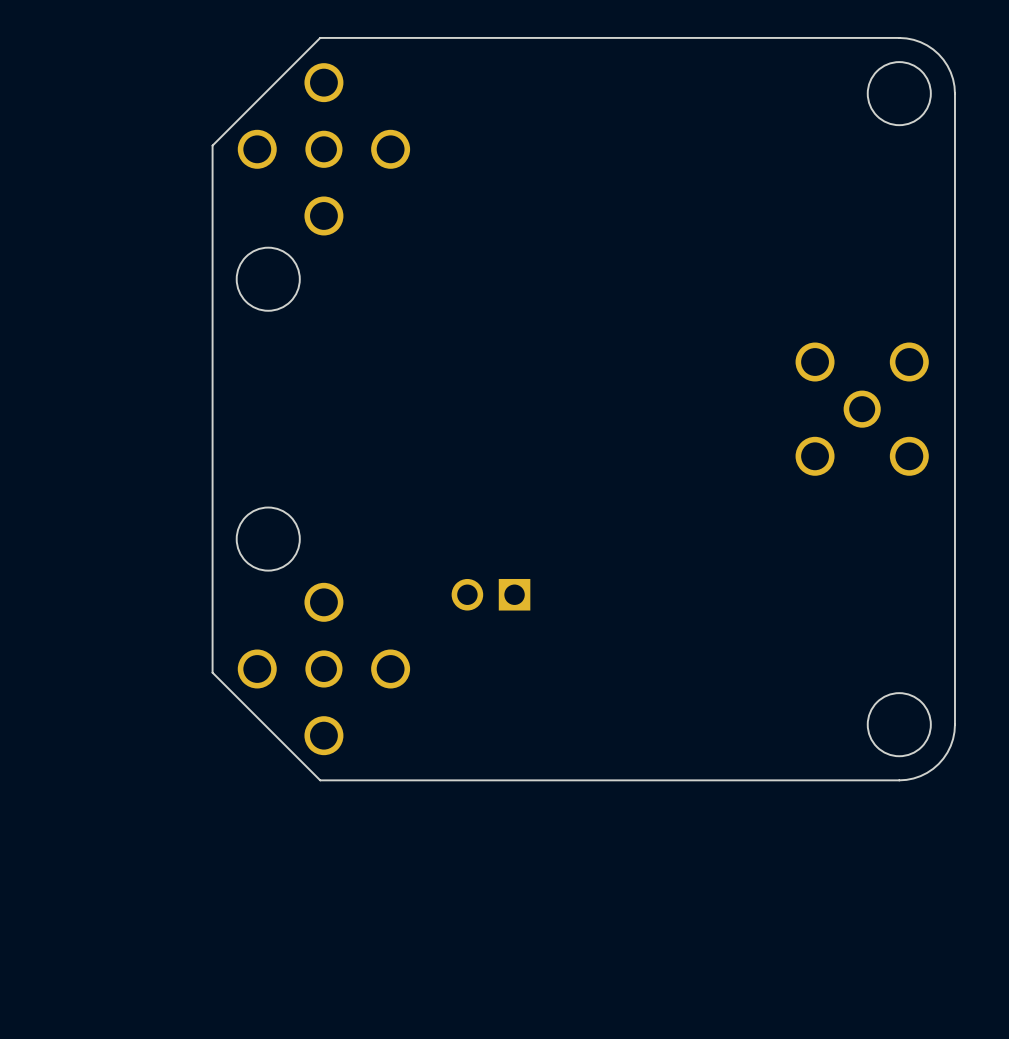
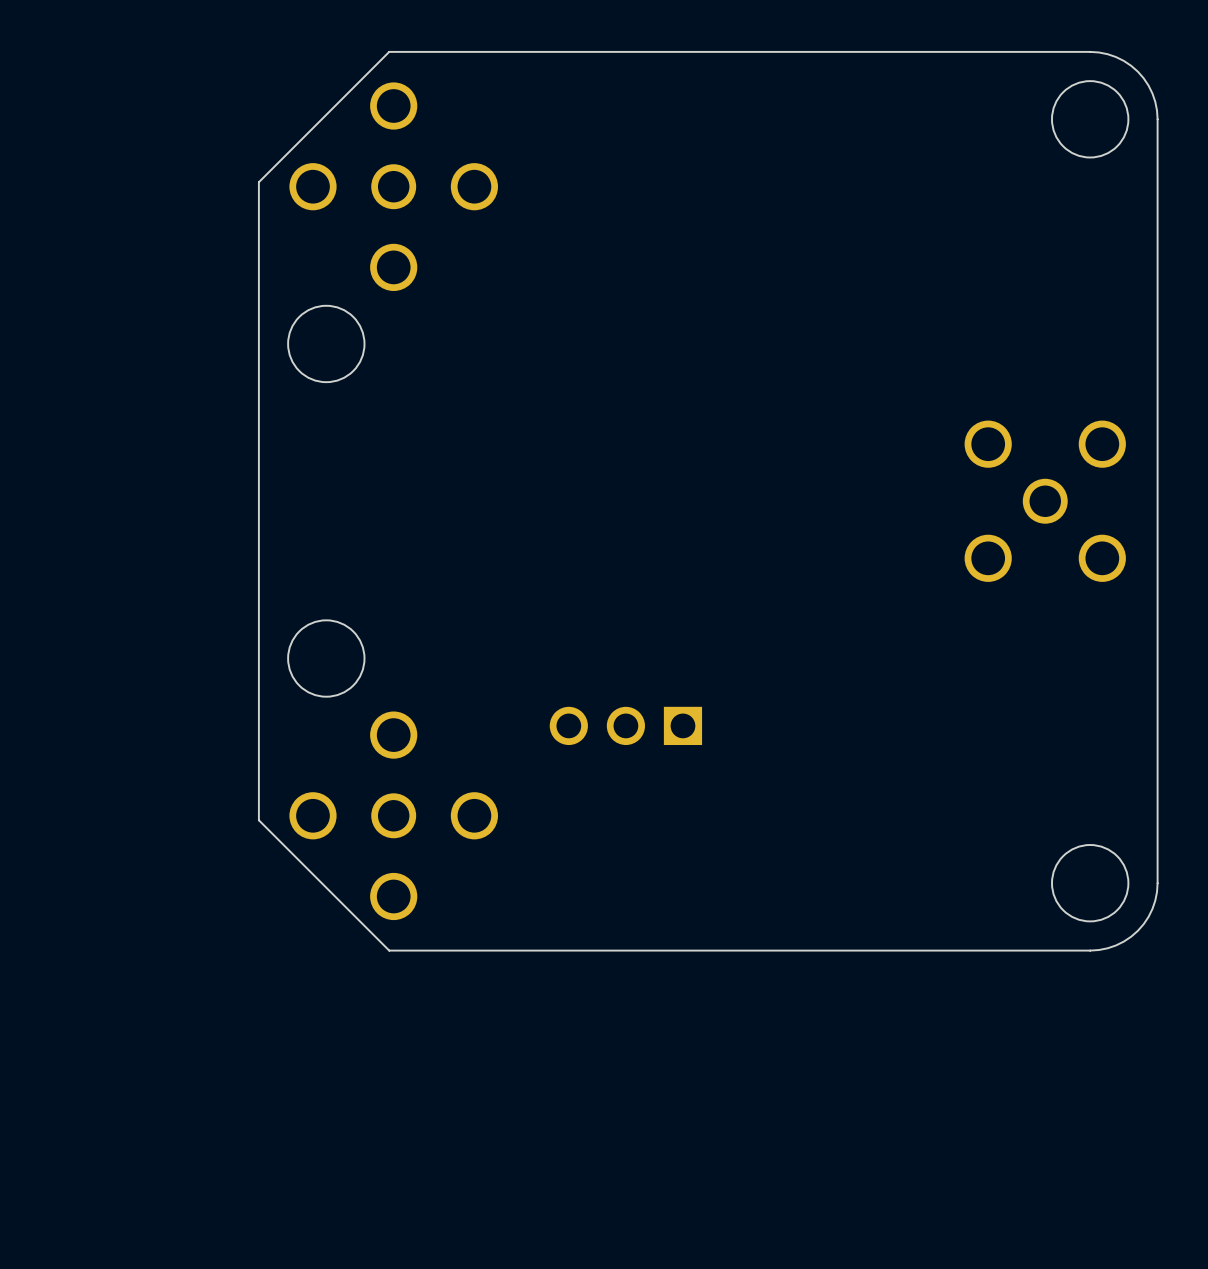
part: (490, 594) -> none
part: none -> (625, 725)

